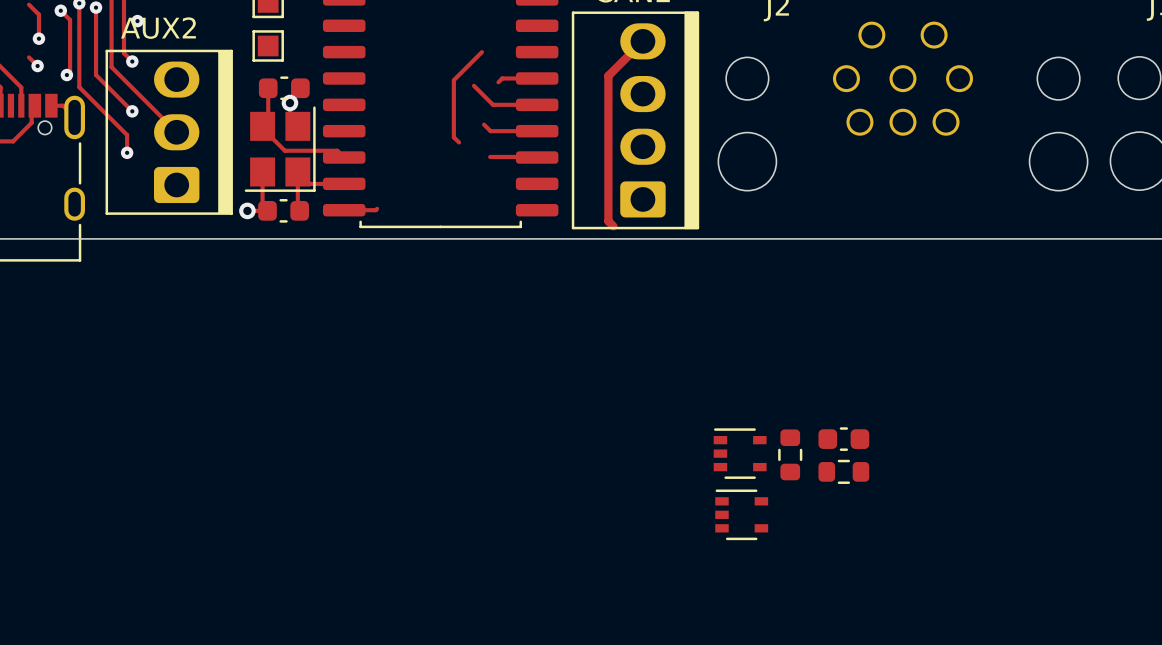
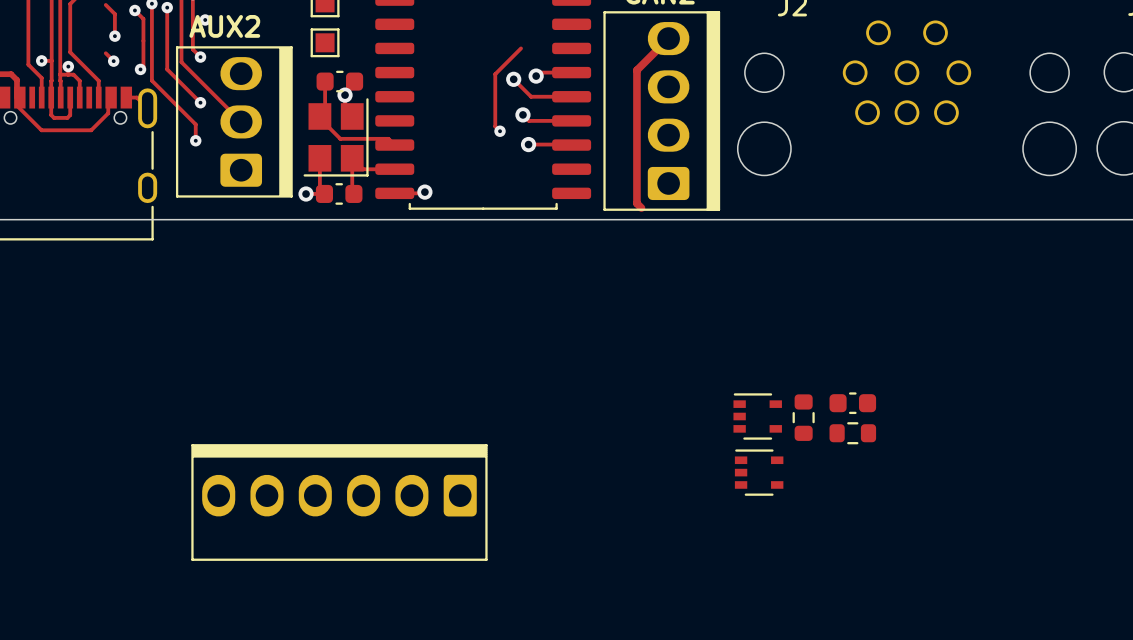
via: none -> (536, 76)
via: none -> (513, 79)
via: none -> (522, 114)
via: none -> (500, 131)
via: none -> (528, 144)
via: none -> (424, 192)
part: none -> (339, 502)

